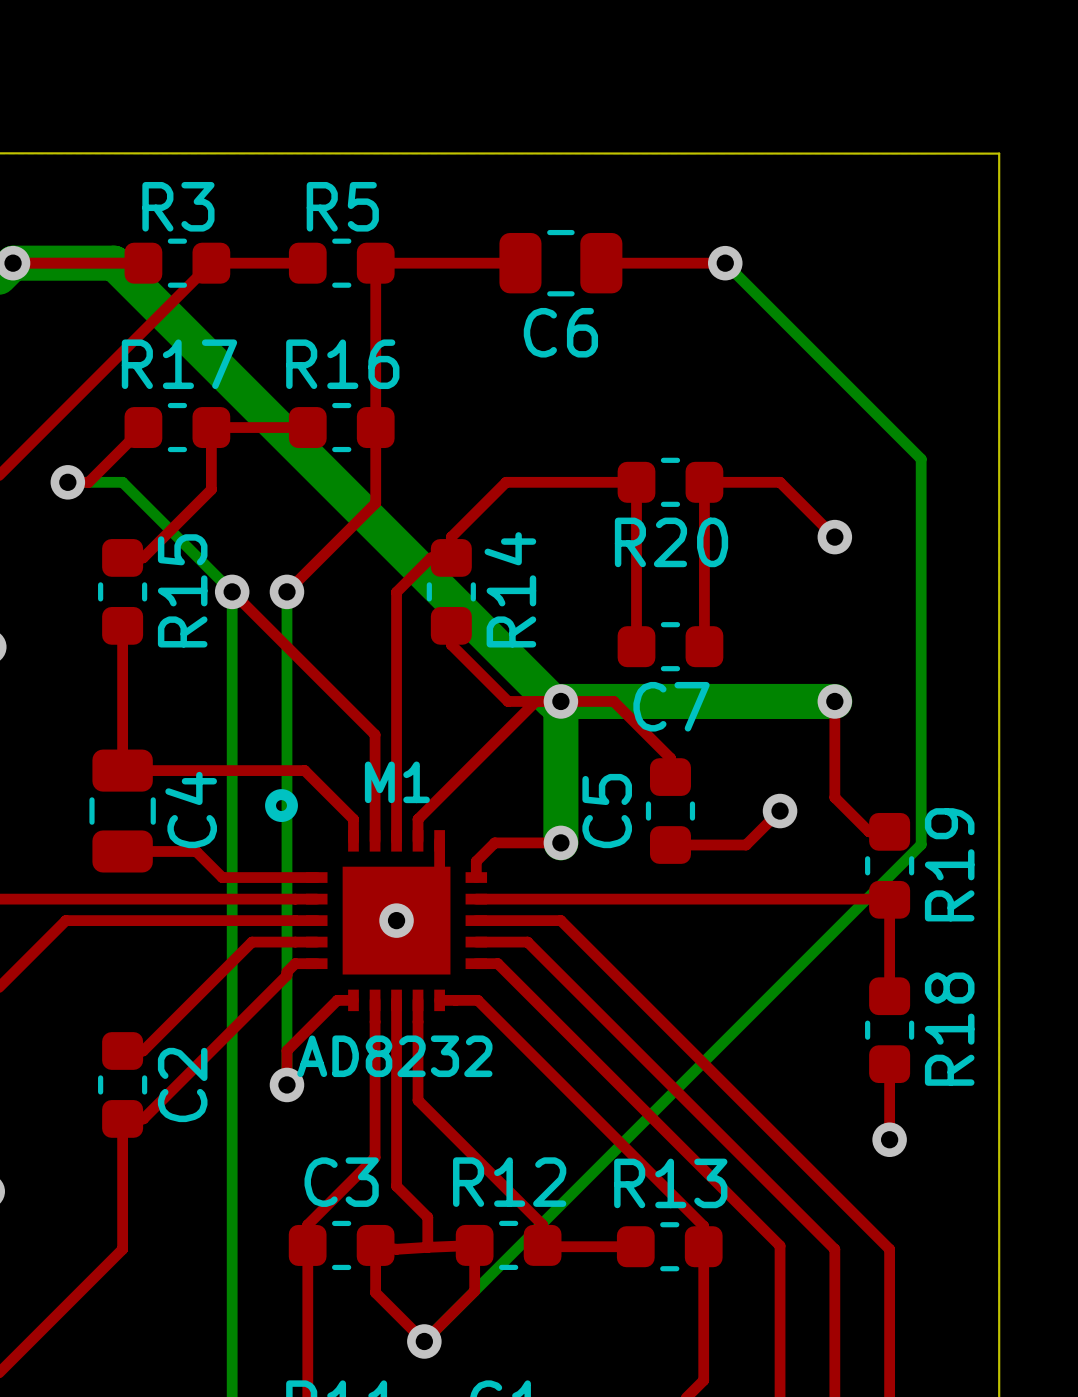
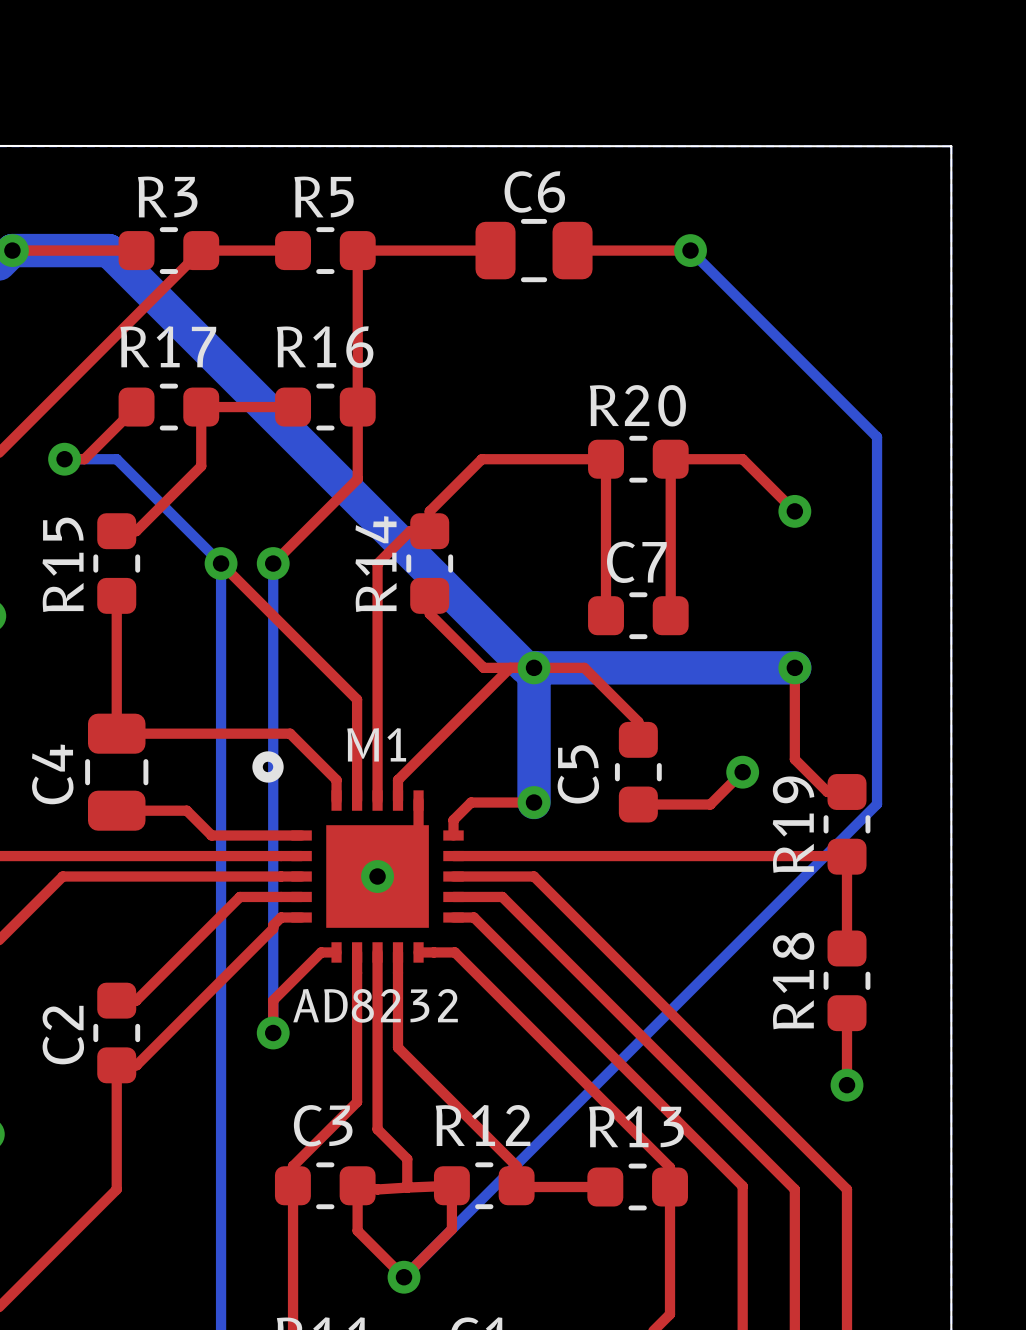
C6 name position: C6 (560, 332) -> C6 (534, 191)
R20 name position: R20 (671, 542) -> R20 (637, 405)
R14 name position: R14 (510, 589) -> R14 (376, 564)
R15 name position: R15 (182, 590) -> R15 (63, 564)
C7 name position: C7 (671, 706) -> C7 (636, 562)
C4 name position: C4 (191, 810) -> C4 (52, 774)
R19 name position: R19 (949, 864) -> R19 (793, 824)
R18 name position: R18 (949, 1029) -> R18 (793, 981)
C2 name position: C2 (182, 1084) -> C2 (63, 1035)

